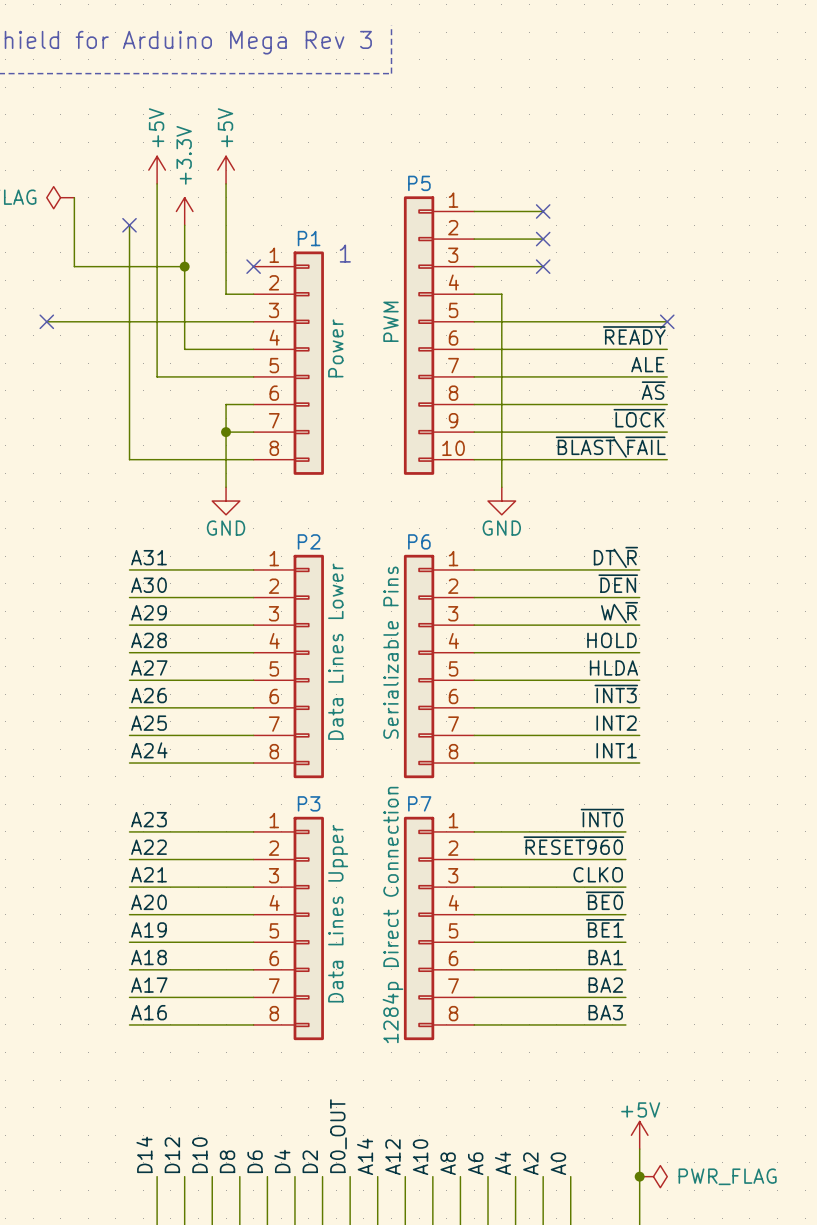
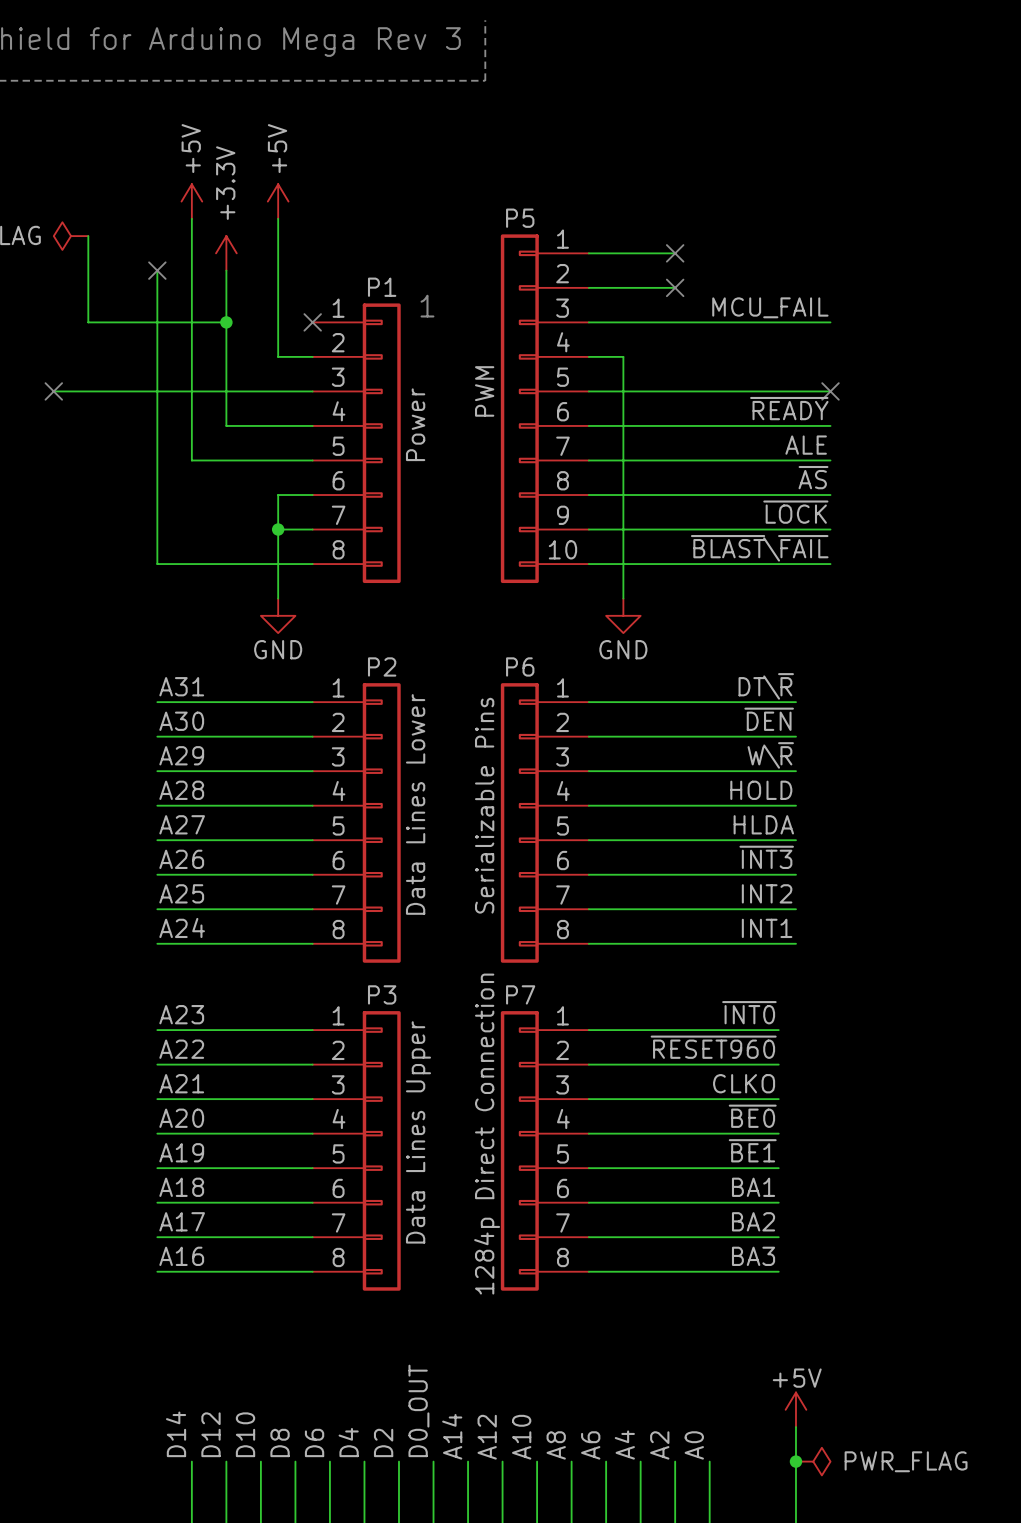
label: none -> MCU_FAIL (770, 307)
wire: none -> (675, 322) (830, 322)
no-connect mark: (543, 266) -> none

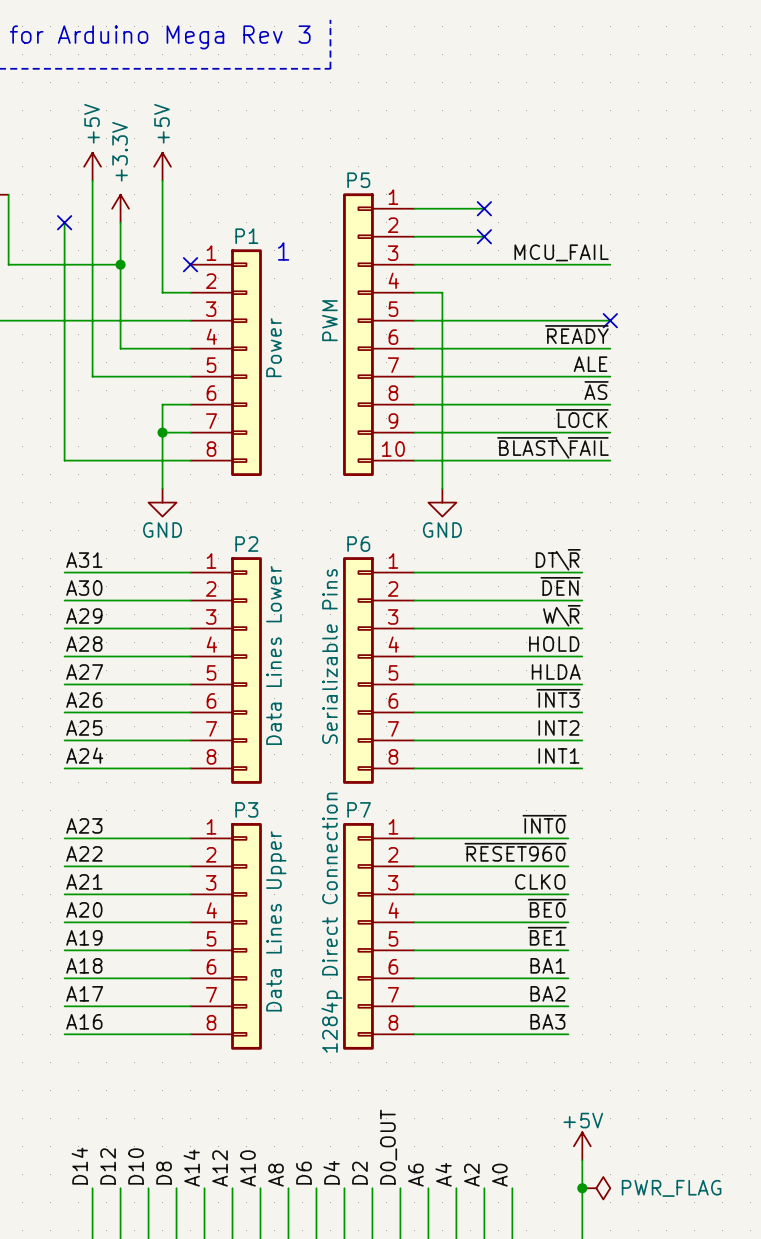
label: D0_OUT (418, 1410) -> A8 (275, 1175)
label: A14 (452, 1436) -> D6 (303, 1173)
label: A12 (487, 1437) -> D4 (331, 1172)
label: A10 (521, 1437) -> D2 (359, 1173)
label: D6 (314, 1442) -> A14 (191, 1168)
label: D4 (348, 1442) -> A12 (220, 1168)
label: D2 (383, 1442) -> A10 (248, 1168)
label: A8 (556, 1445) -> D0_OUT (388, 1147)

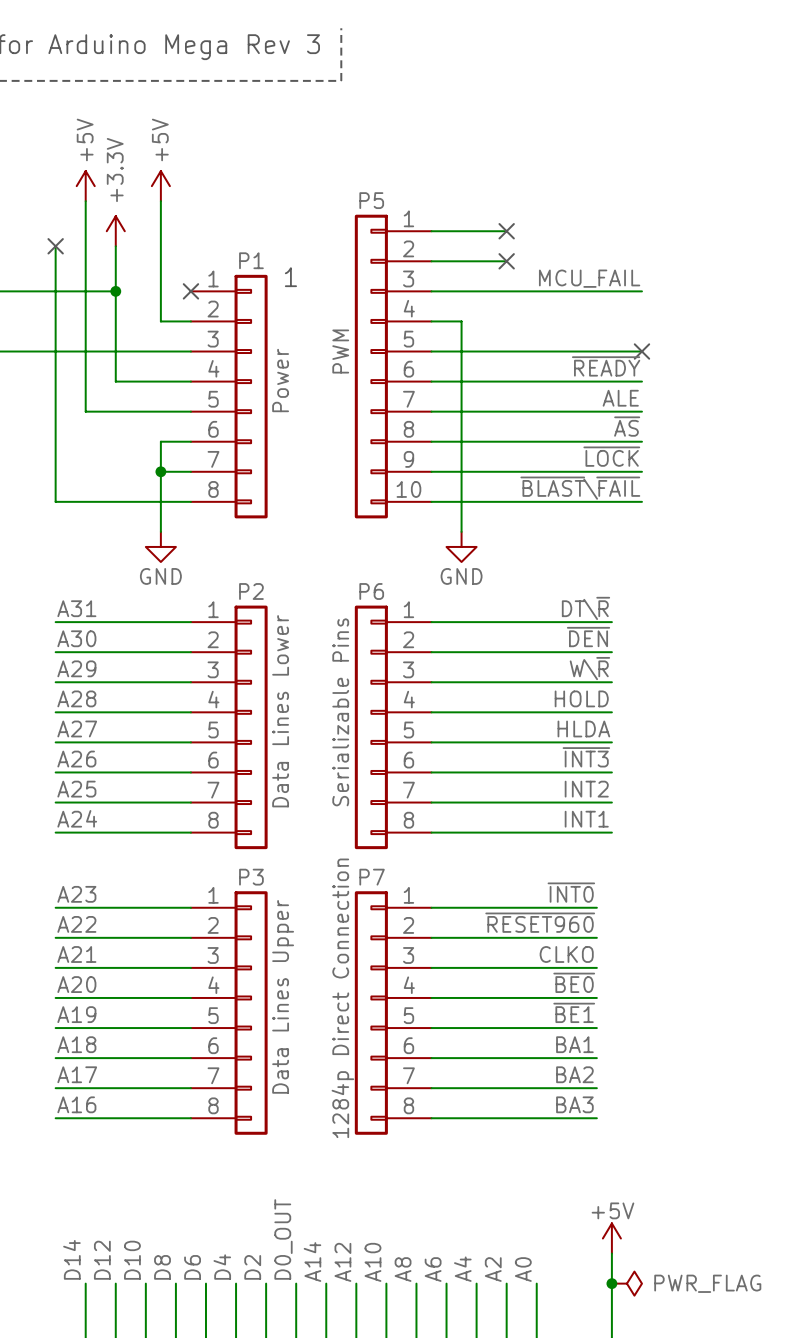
label: D0_OUT (388, 1147) -> A8 (403, 1269)
label: A14 (191, 1168) -> D6 (192, 1267)
label: A12 (220, 1168) -> D4 (222, 1267)
label: A10 (248, 1168) -> D2 (252, 1267)
label: D4 (331, 1172) -> A12 (342, 1262)
label: D6 (303, 1173) -> A14 (312, 1262)
label: D2 (359, 1173) -> A10 (372, 1262)
label: A8 (275, 1175) -> D0_OUT (283, 1239)

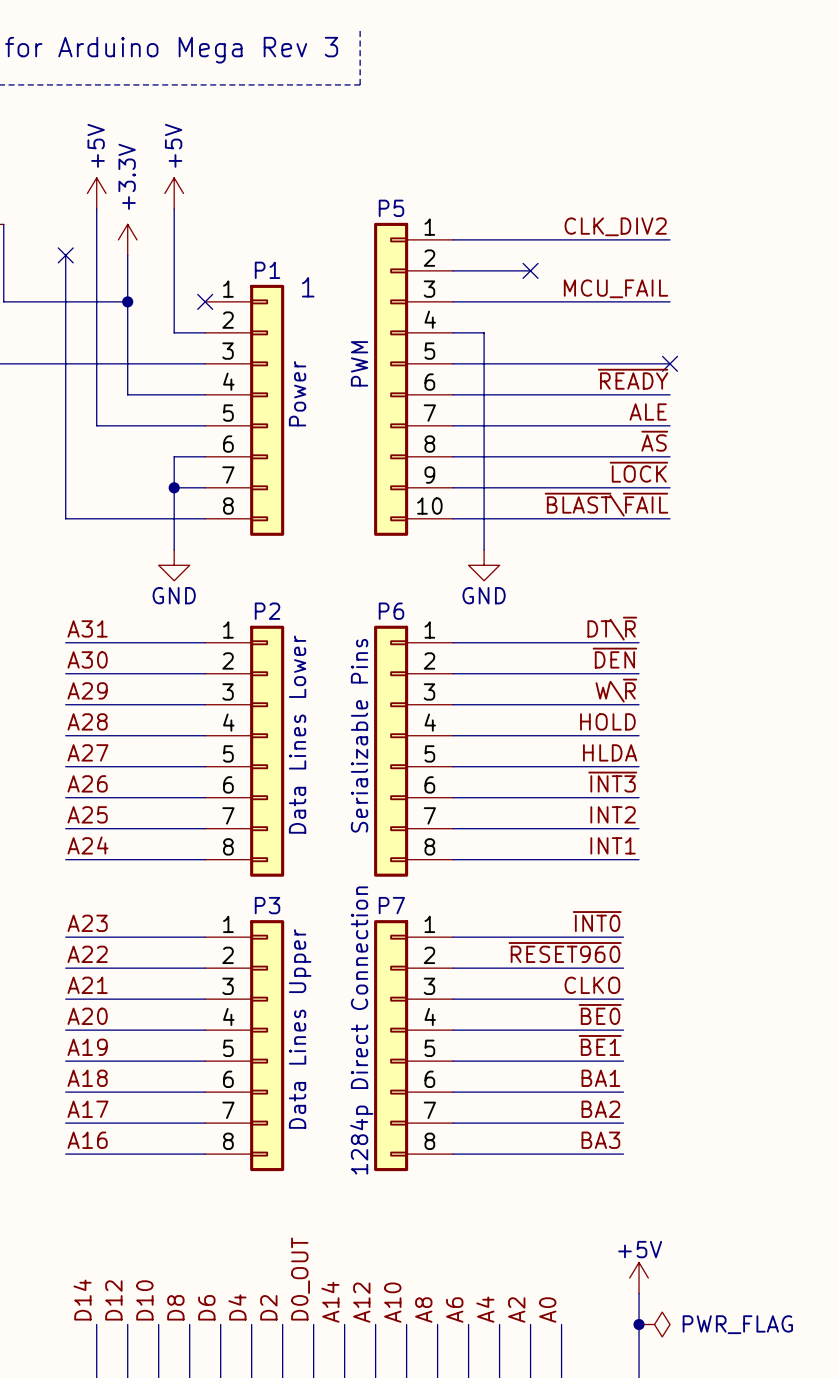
label: none -> CLK_DIV2 (615, 226)
wire: none -> (530, 239) (670, 239)
no-connect mark: (506, 231) -> none

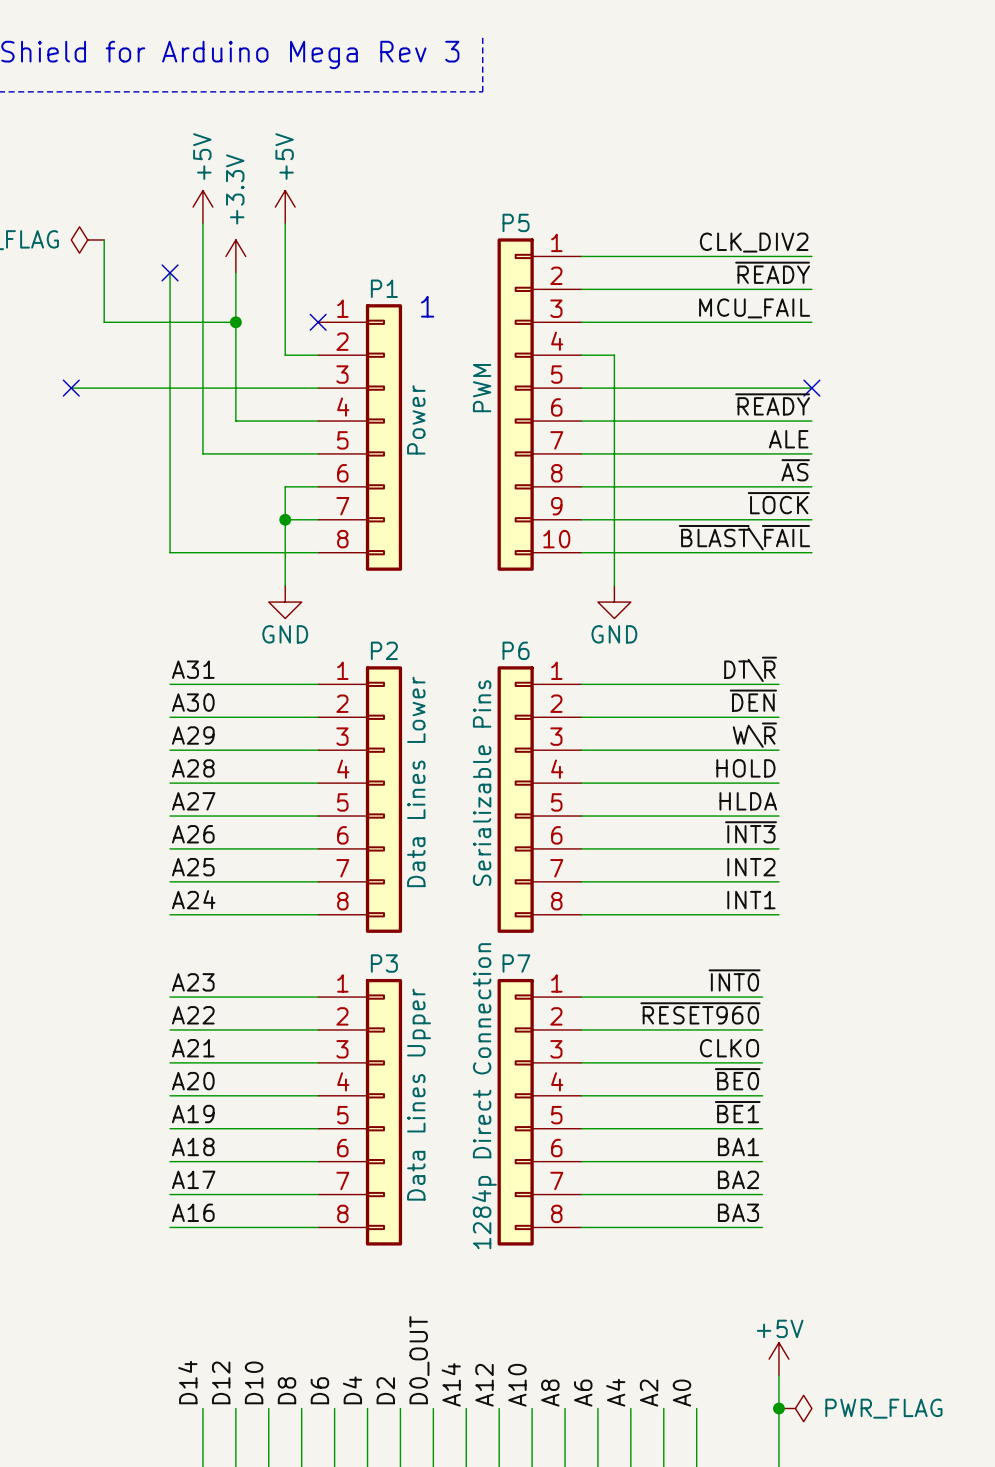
label: none -> ~{READY} (772, 272)
wire: none -> (663, 289) (811, 289)
no-connect mark: (530, 270) -> none

